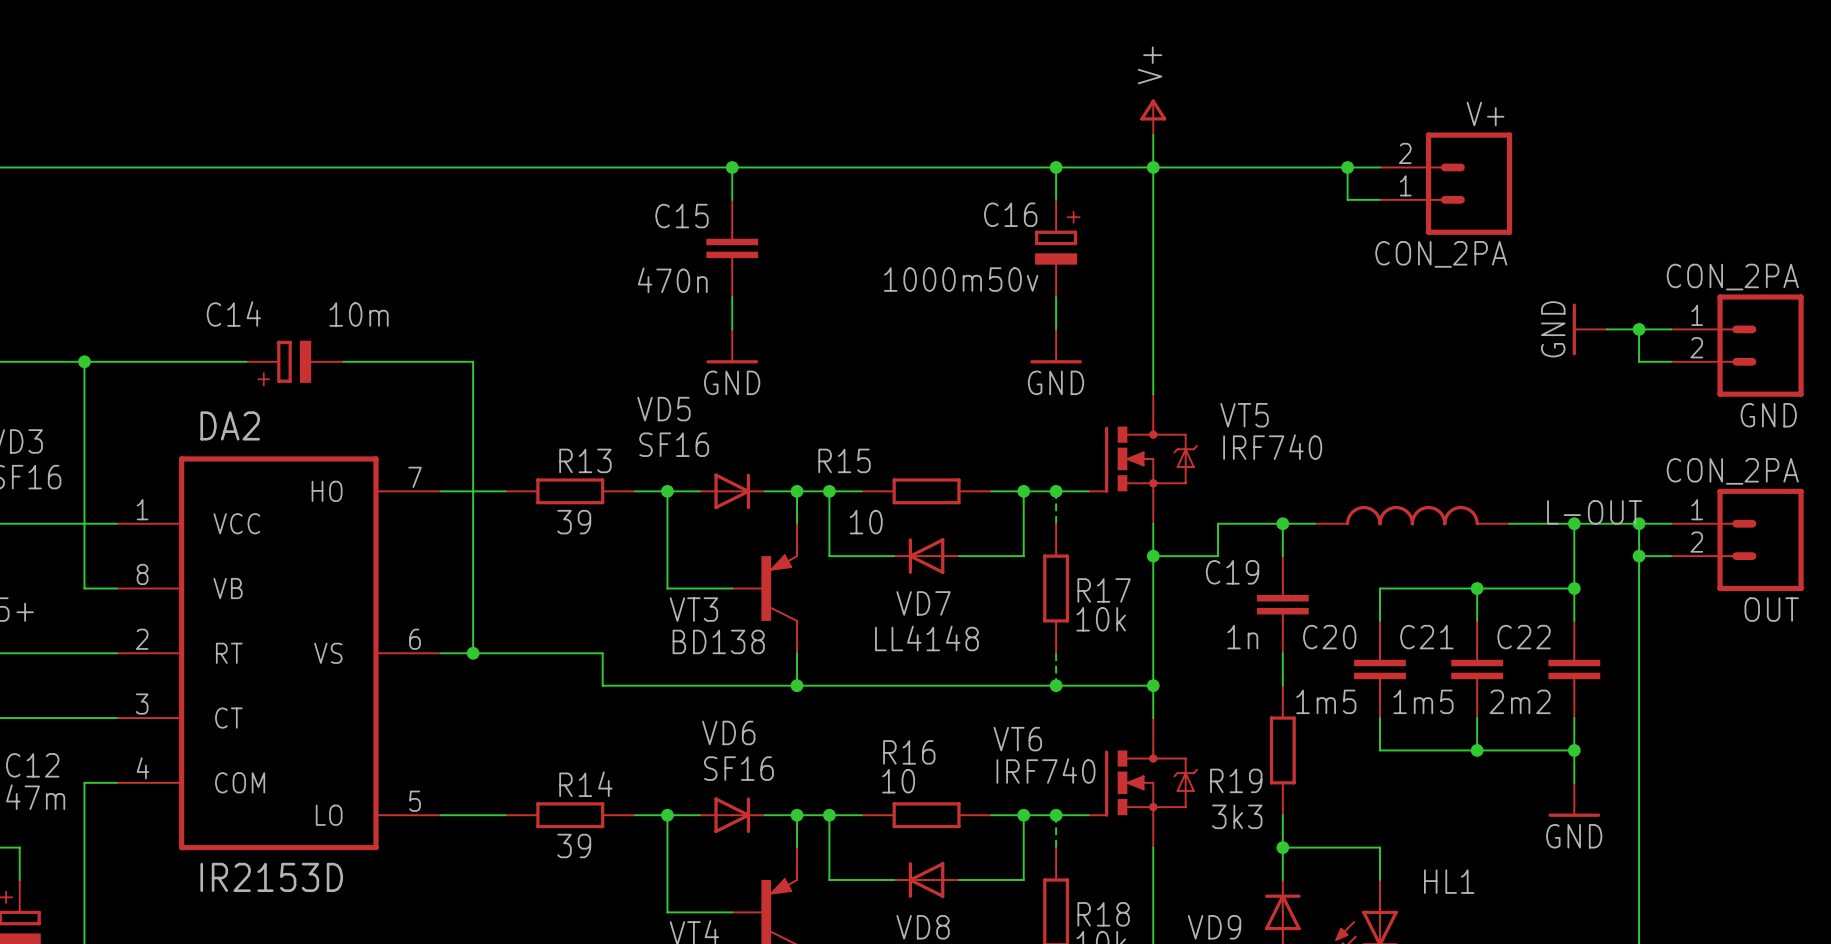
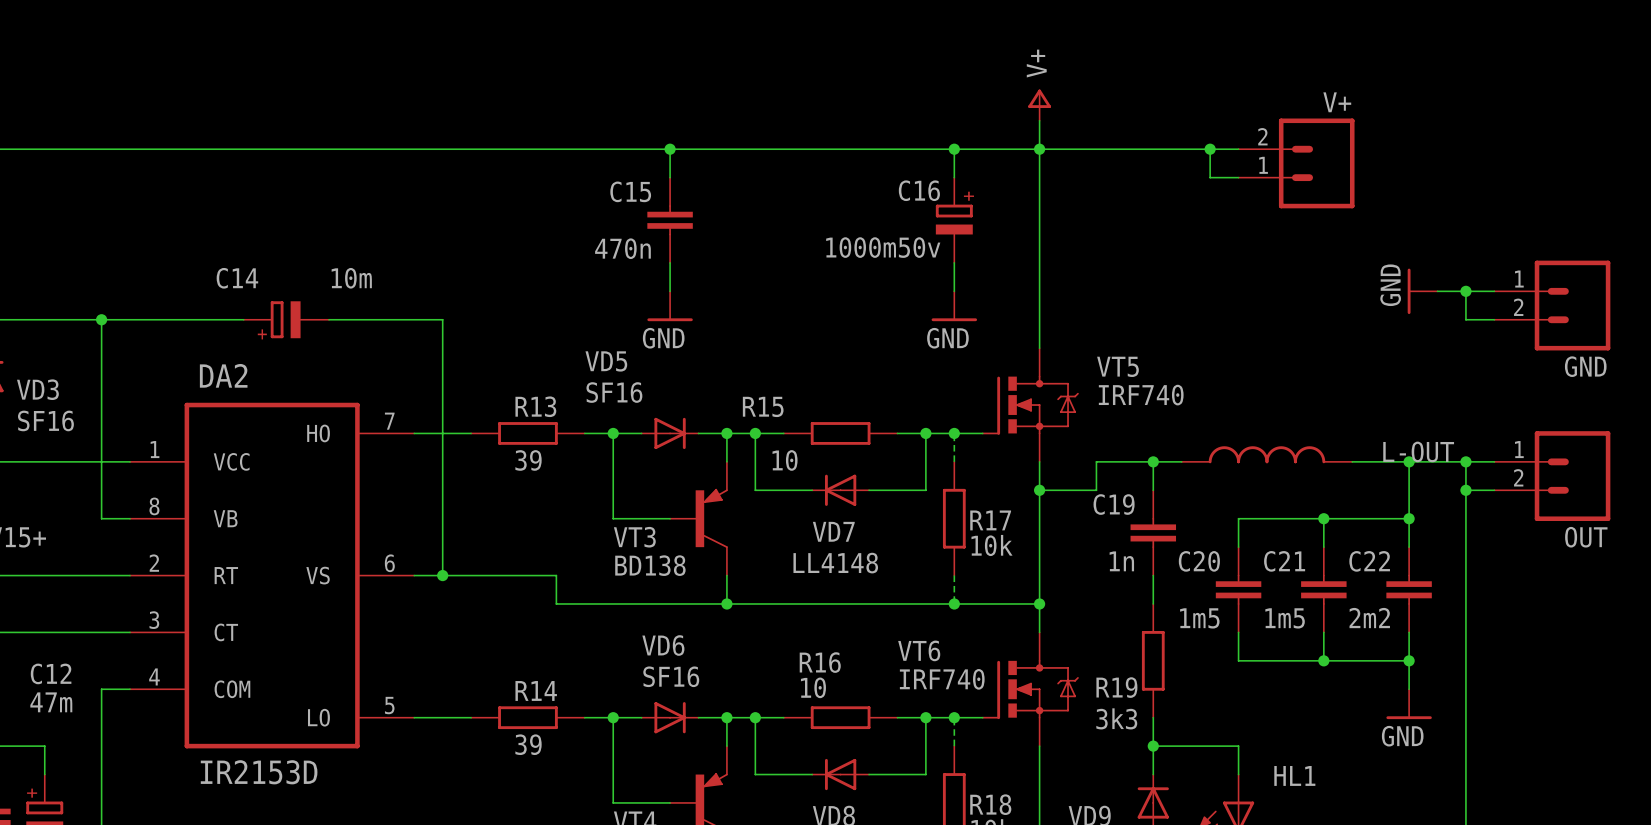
V+ value: CON_2PA (1441, 254) -> none
GND value: CON_2PA (1732, 277) -> none
OUT value: CON_2PA (1732, 471) -> none

